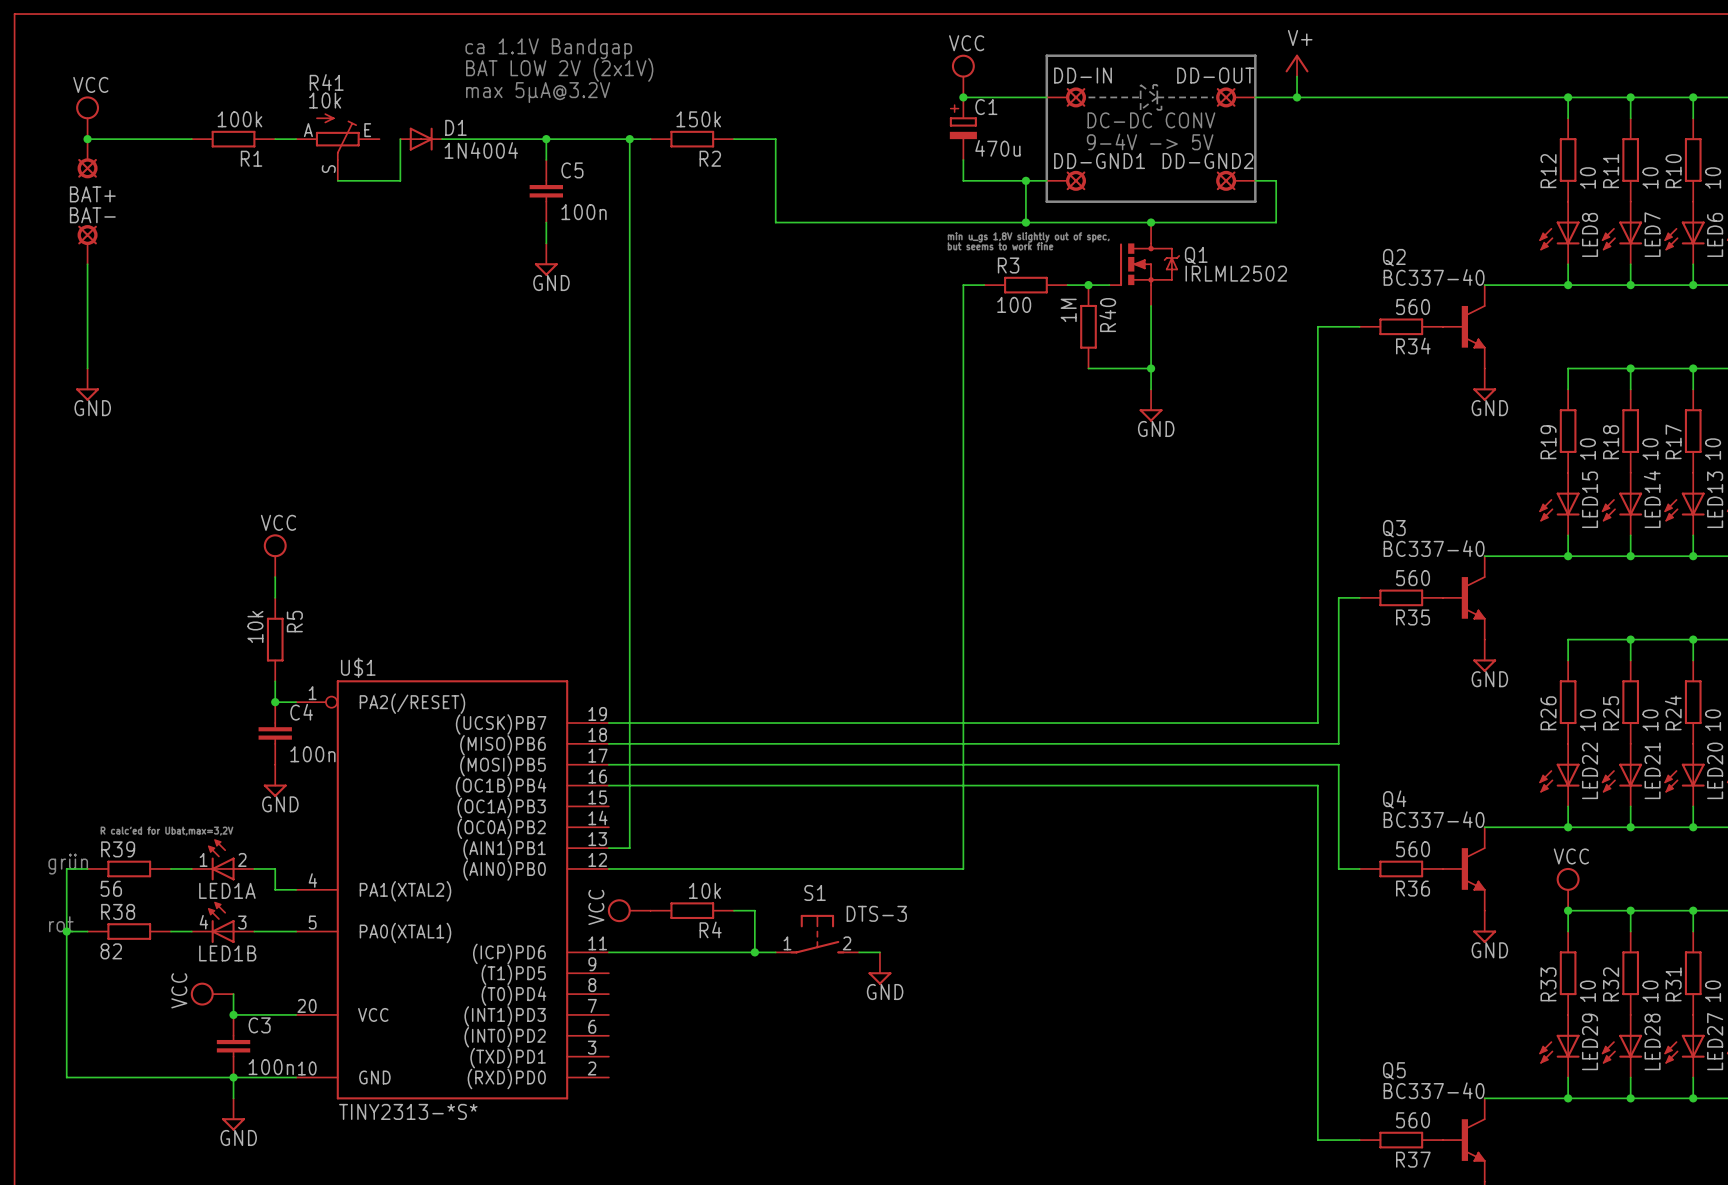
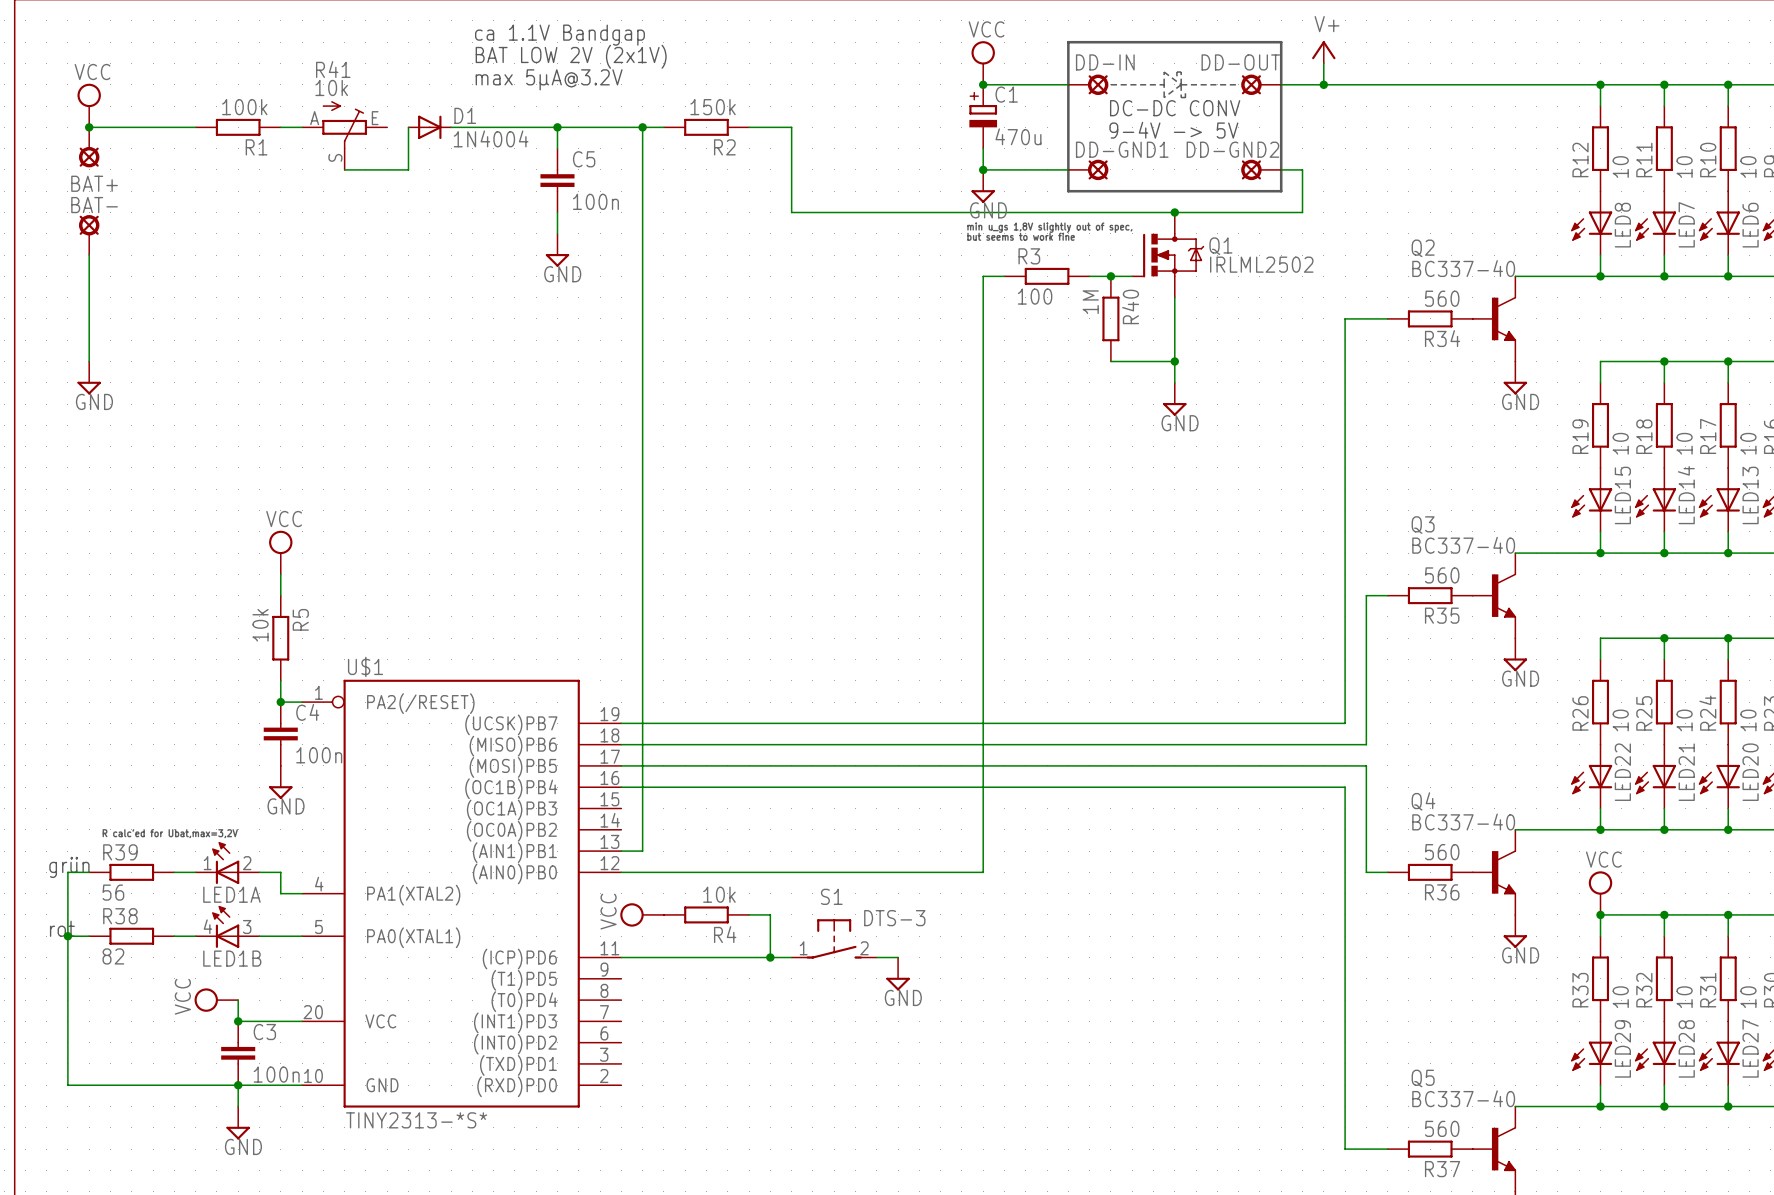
junction: none -> (983, 169)
wire: (1025, 180) (1025, 222) -> none
junction: (1025, 180) -> none
power symbol: none -> GND (983, 186)
junction: (1025, 222) -> none

